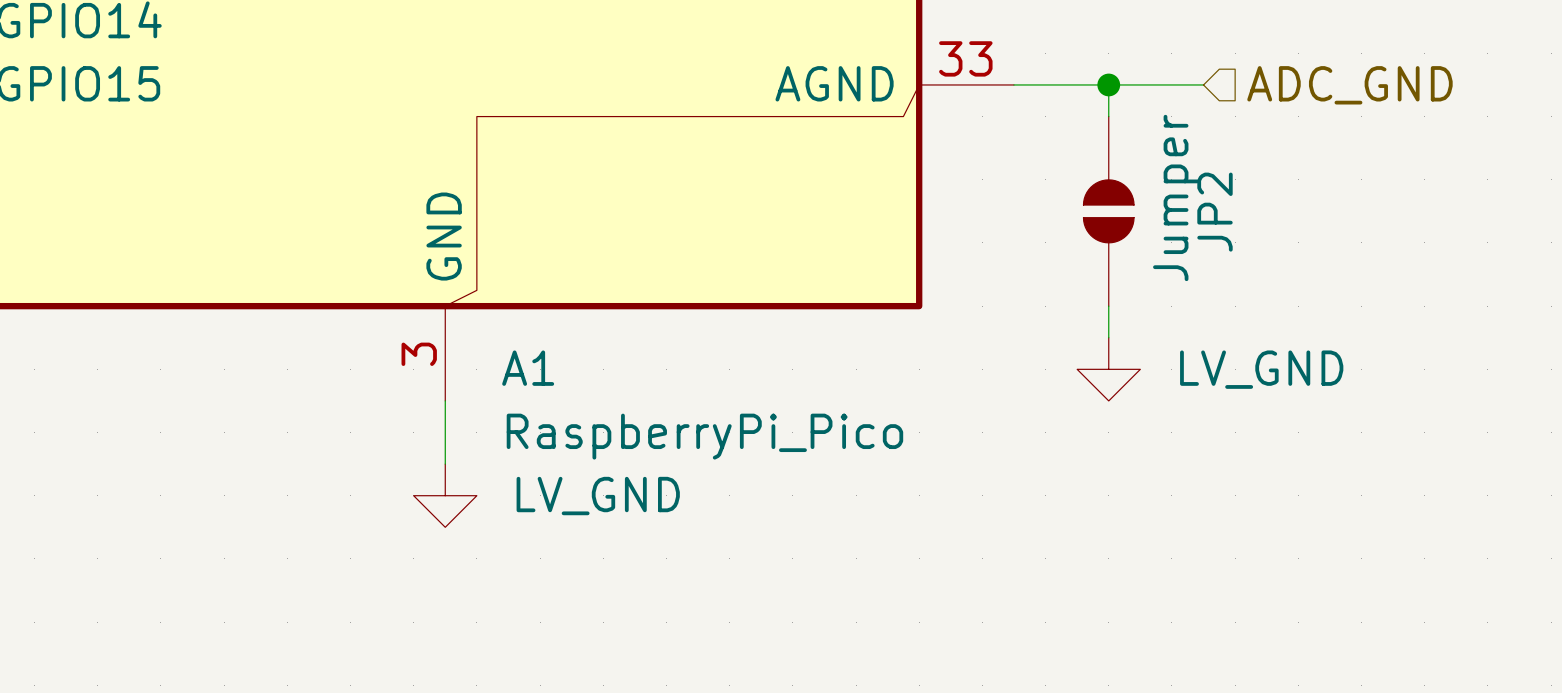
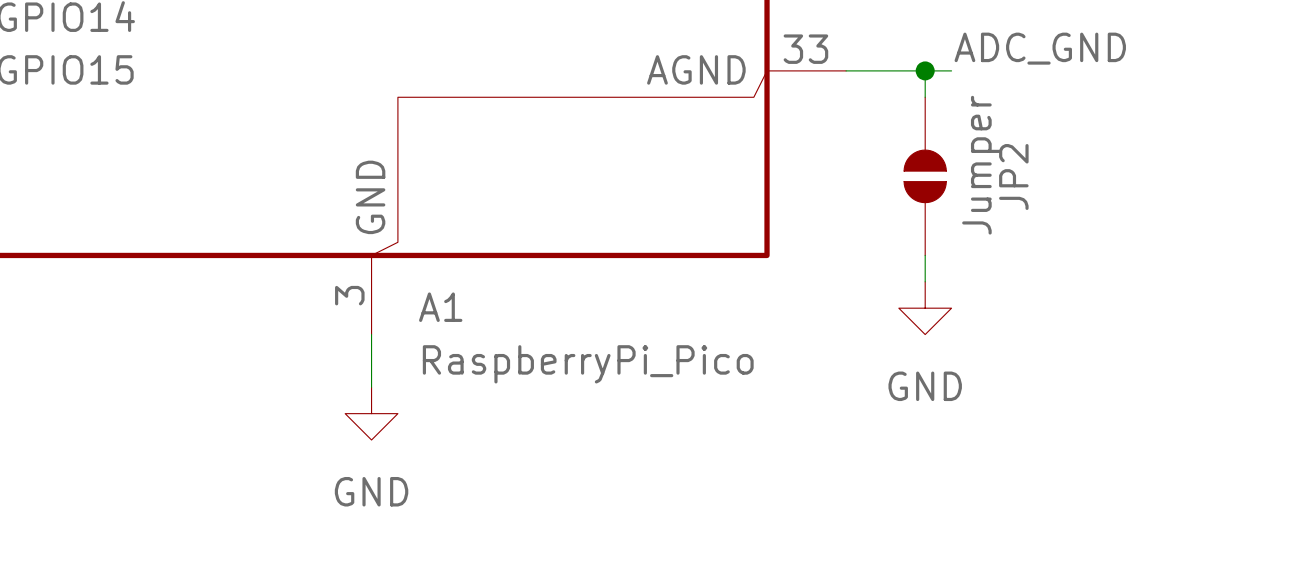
label: none -> ADC_GND (1040, 48)
wire: (1140, 84) (1203, 84) -> none
hierarchical label: ADC_GND (1349, 85) -> none
power symbol: LV_GND (1108, 369) -> GND (925, 308)
power symbol: LV_GND (445, 495) -> GND (371, 413)

